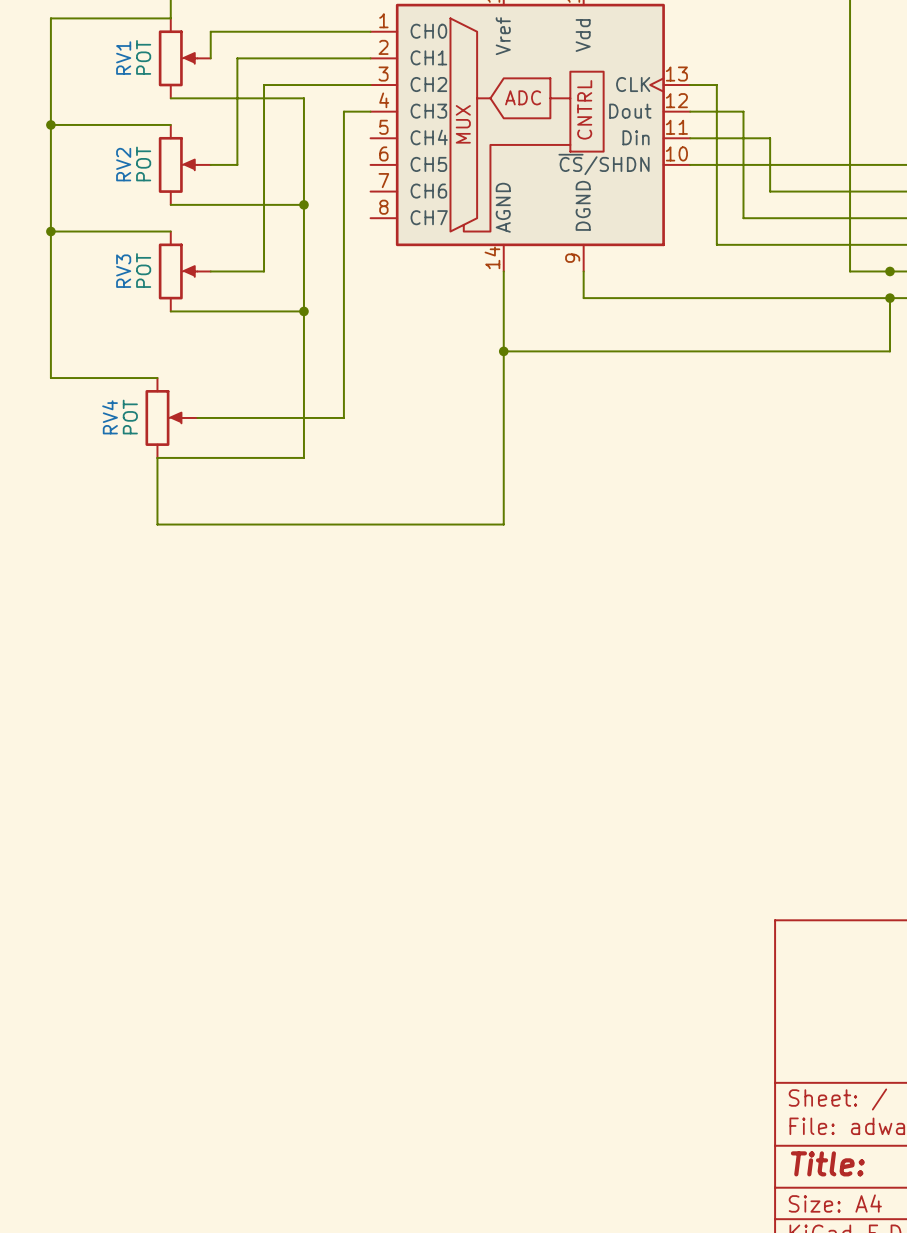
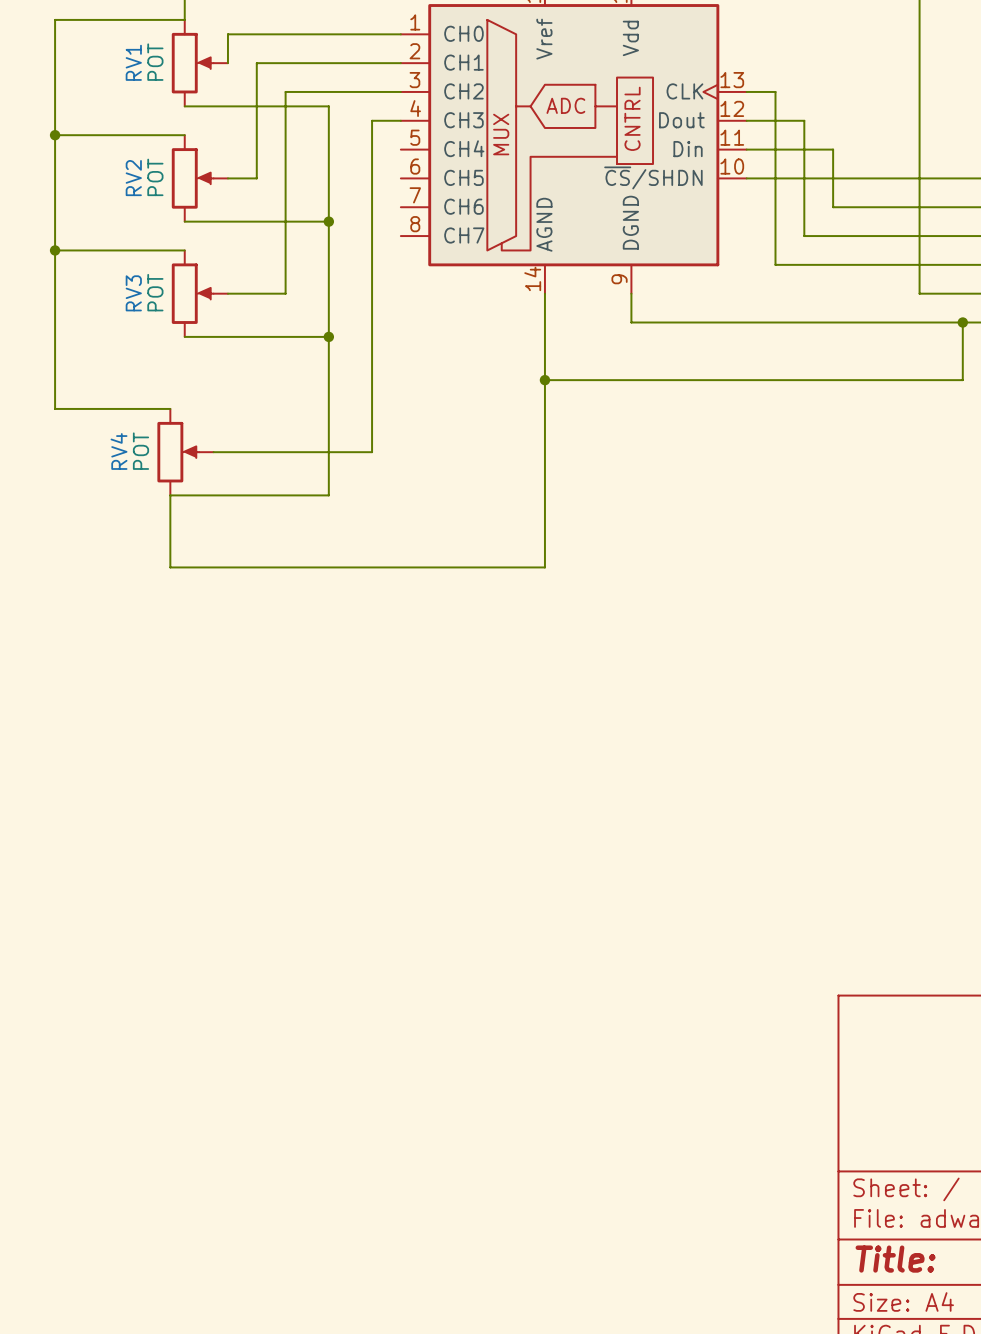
junction: (890, 271) -> none

